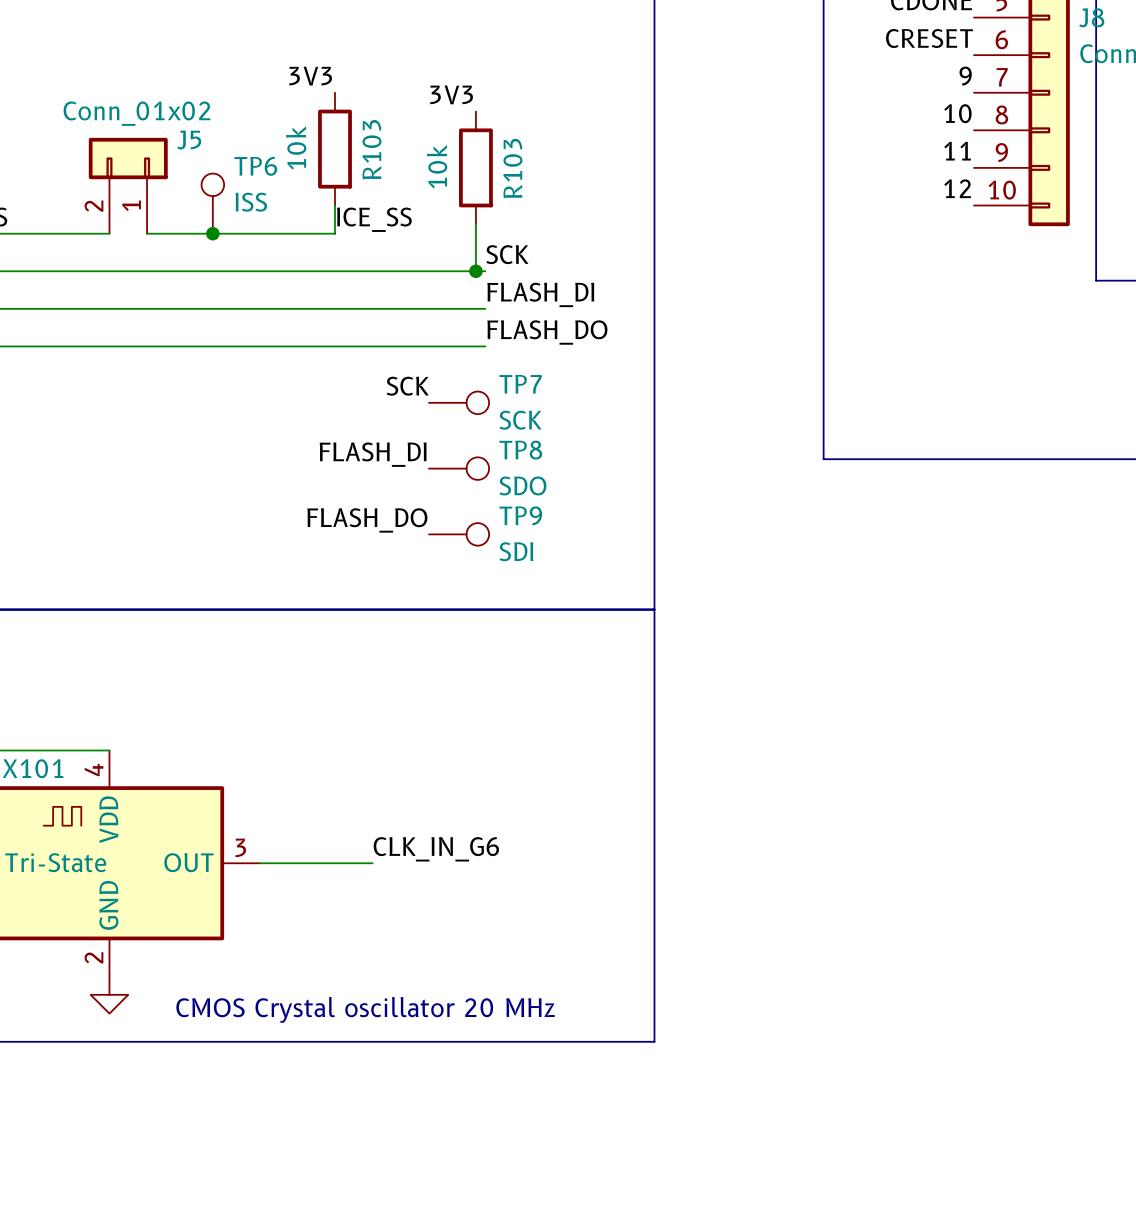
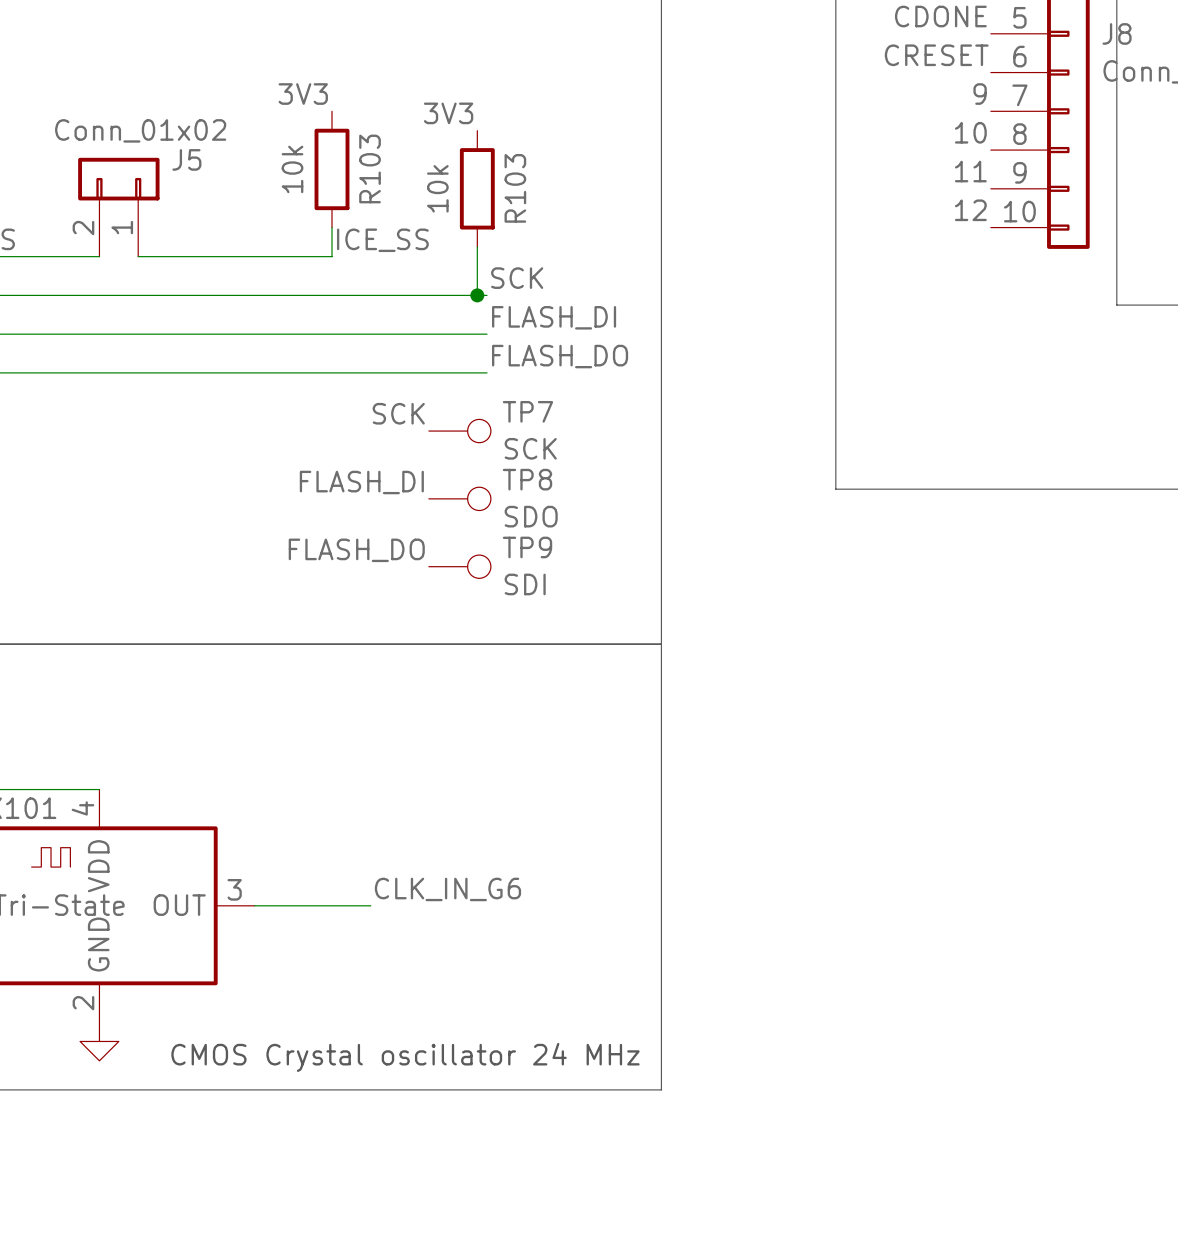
TP6: ISS (212, 203) -> none
junction: (212, 233) -> none
text: CMOS Crystal oscillator 20 MHz (365, 1009) -> CMOS Crystal oscillator 24 MHz (405, 1057)

